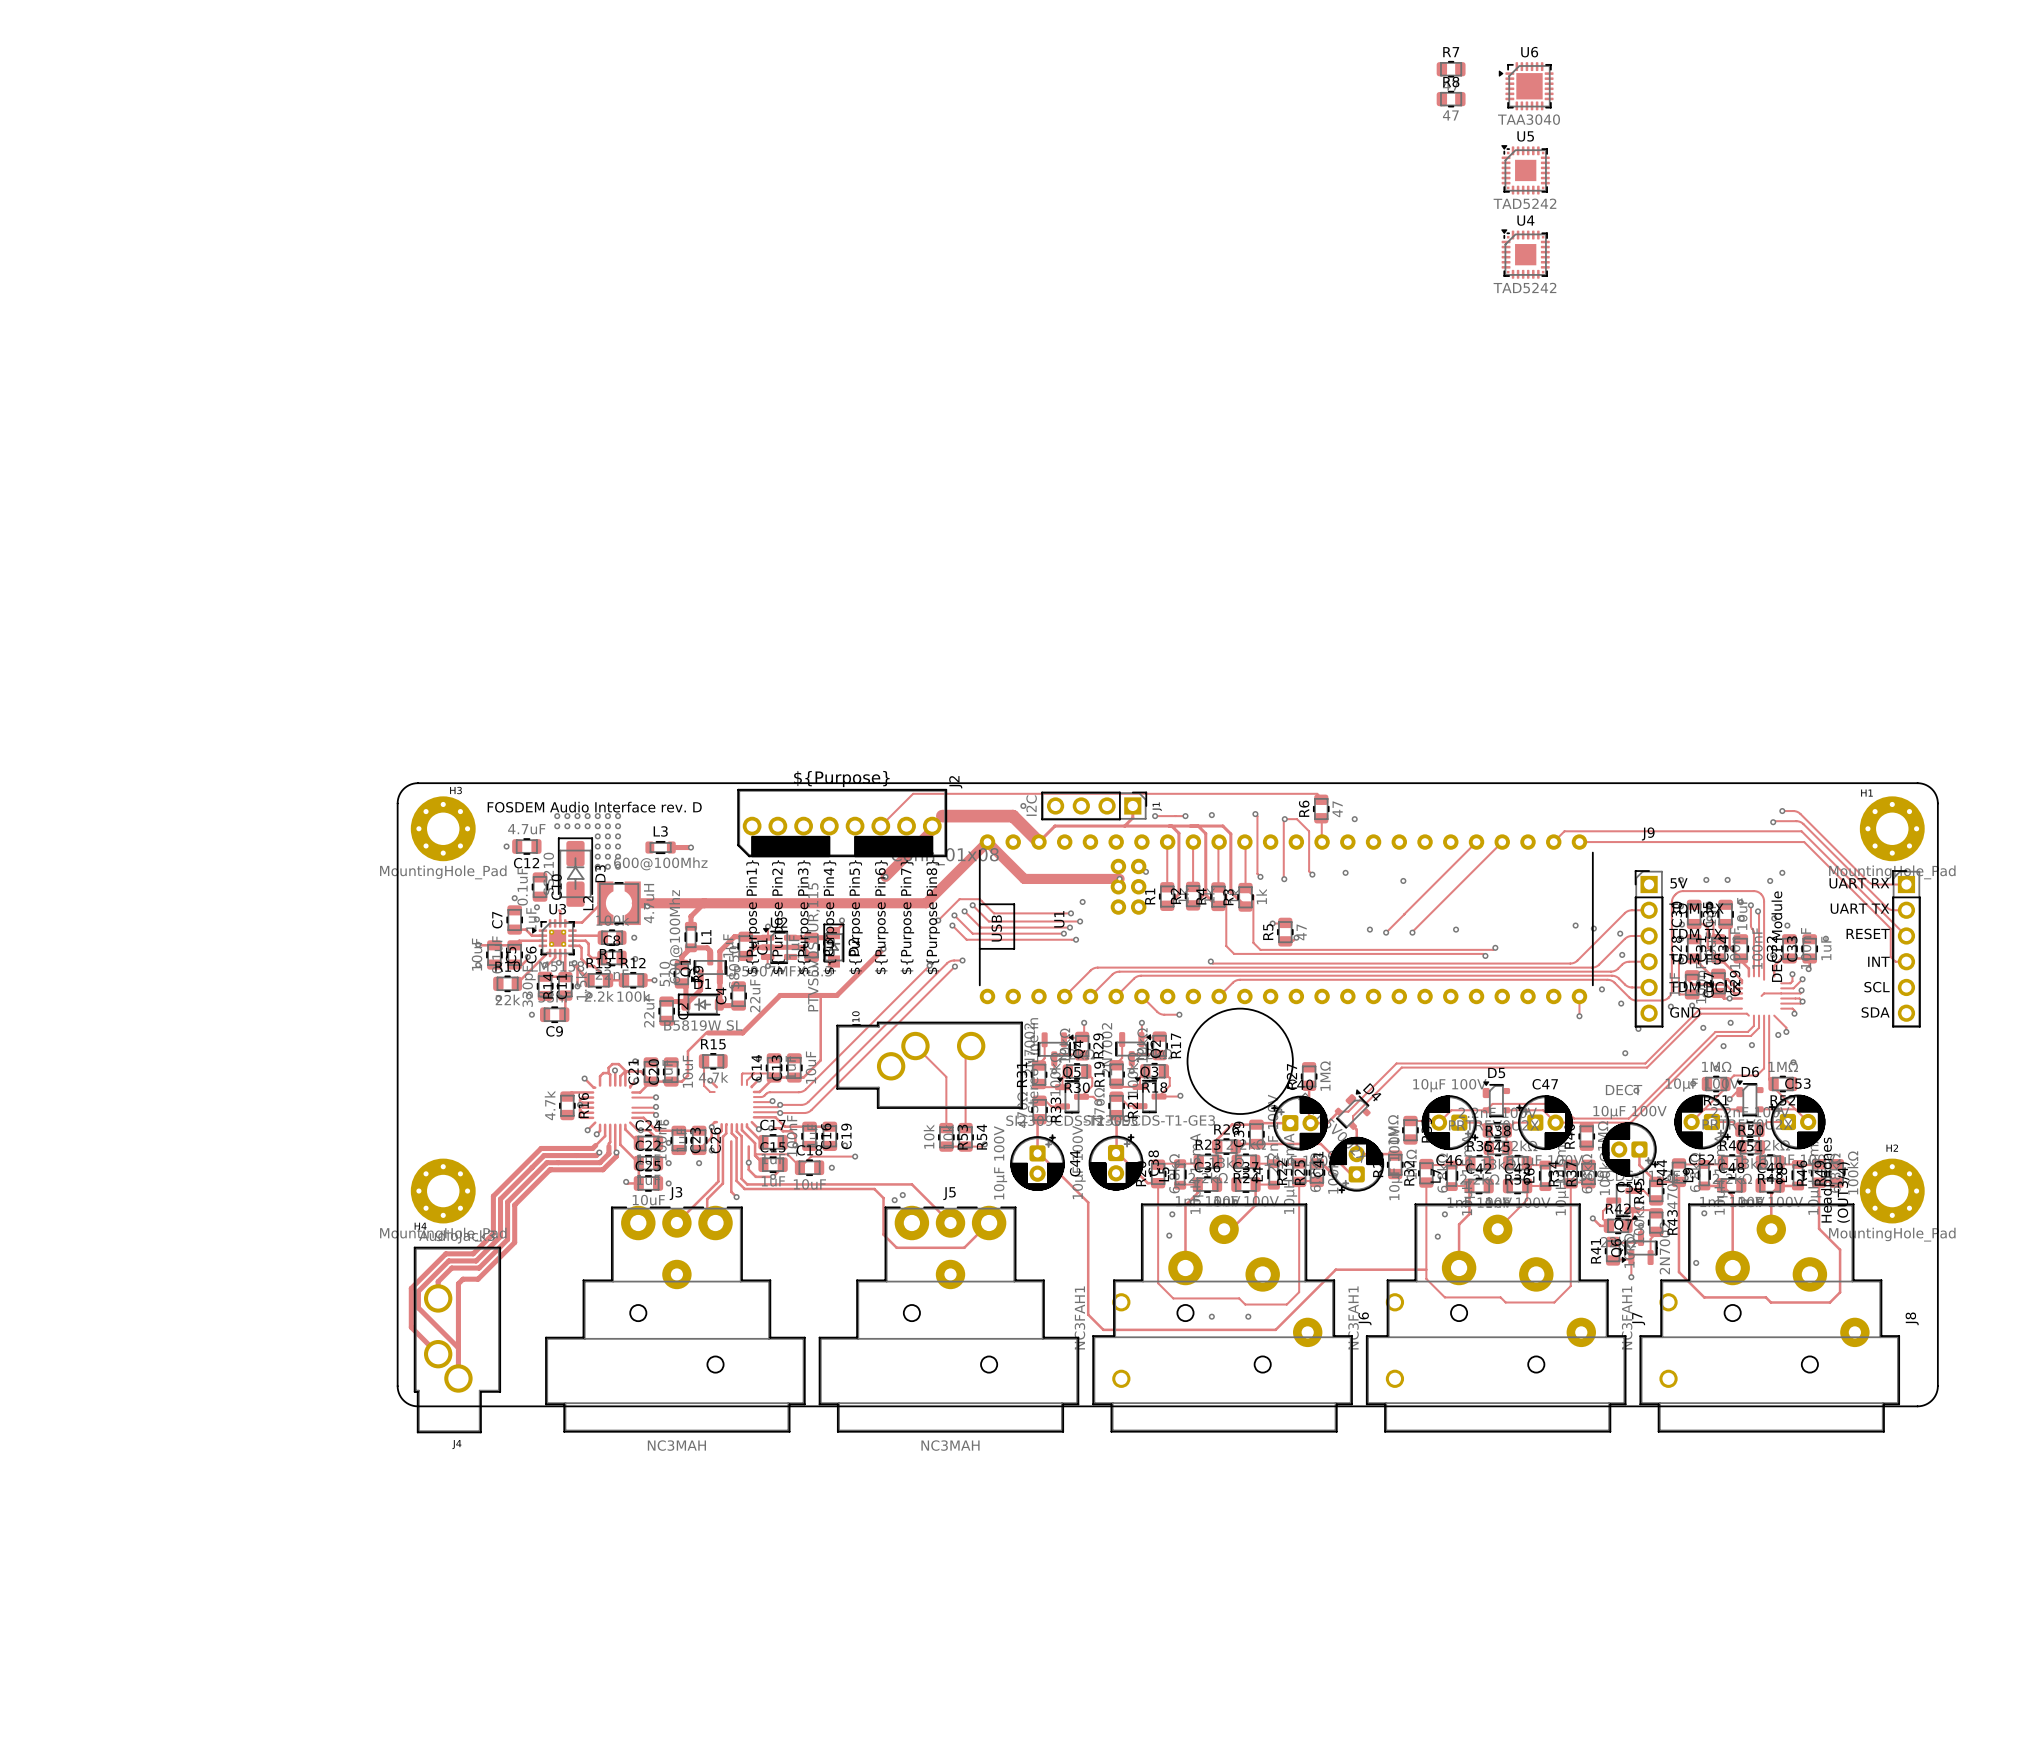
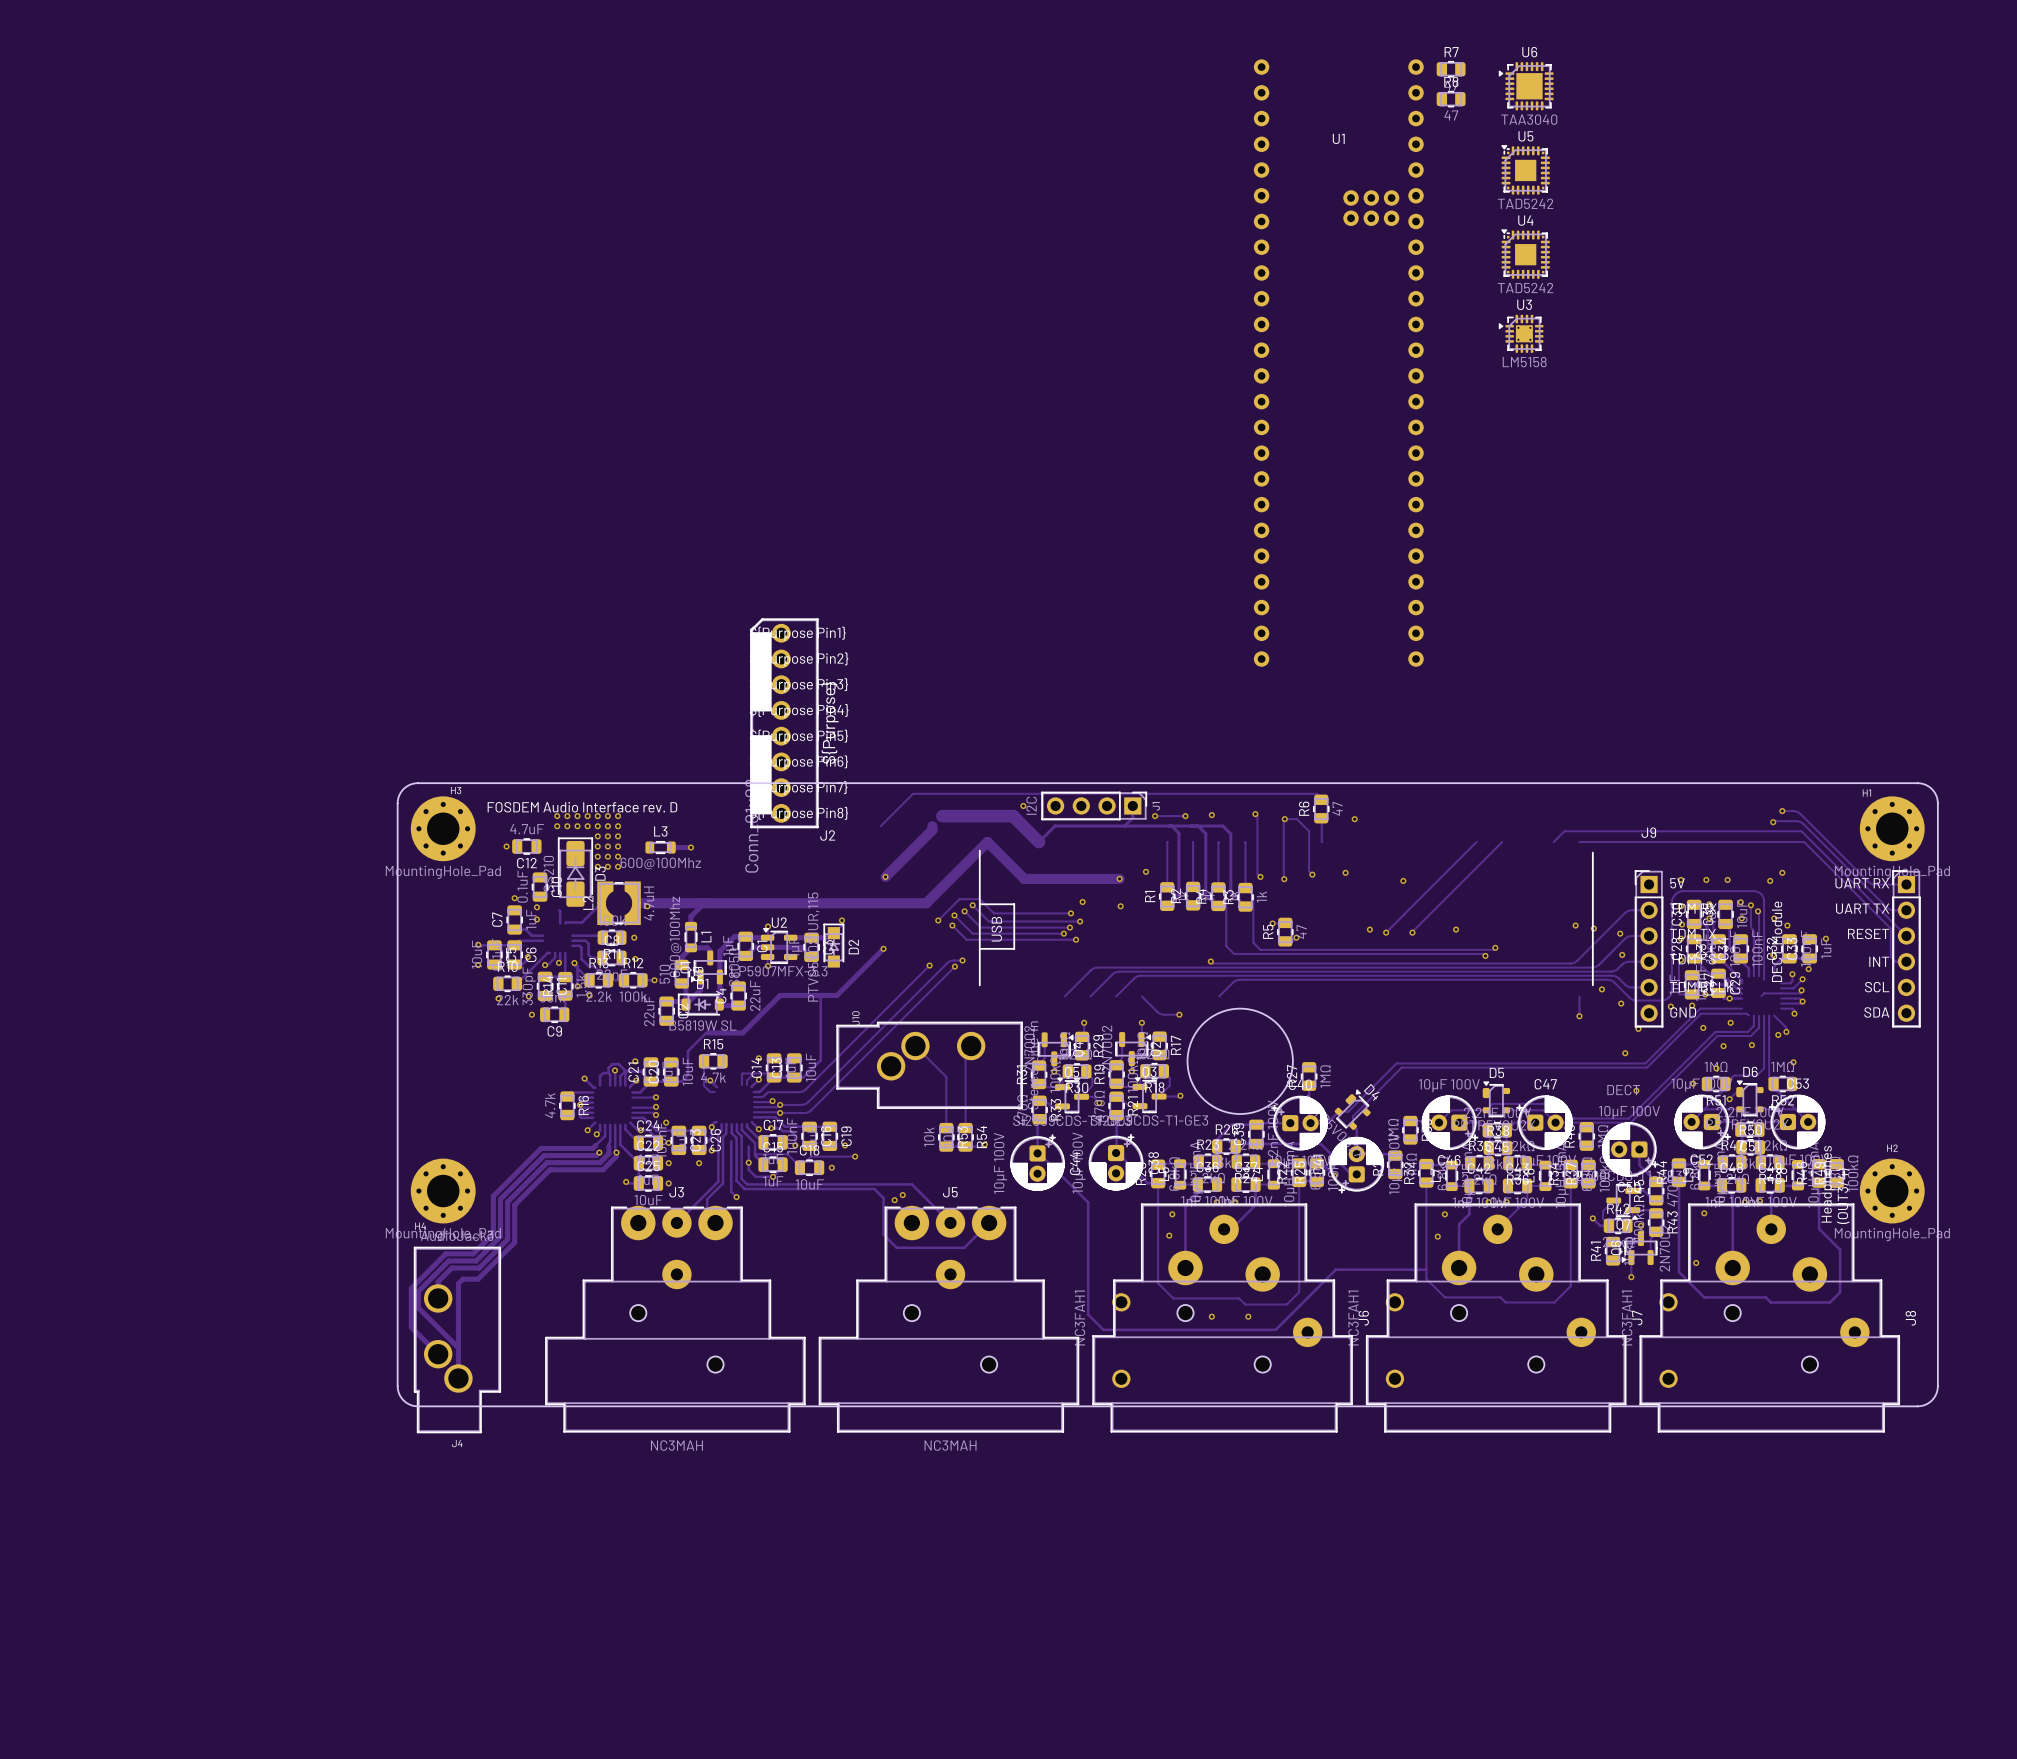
J2 rotation: 0° (842, 823) -> 90° clockwise (784, 723)
U1 rotation: 0° (1283, 919) -> 90° clockwise (1338, 363)
U1 position: (1283, 919) -> (1338, 363)
U3 position: (554, 938) -> (1521, 333)

